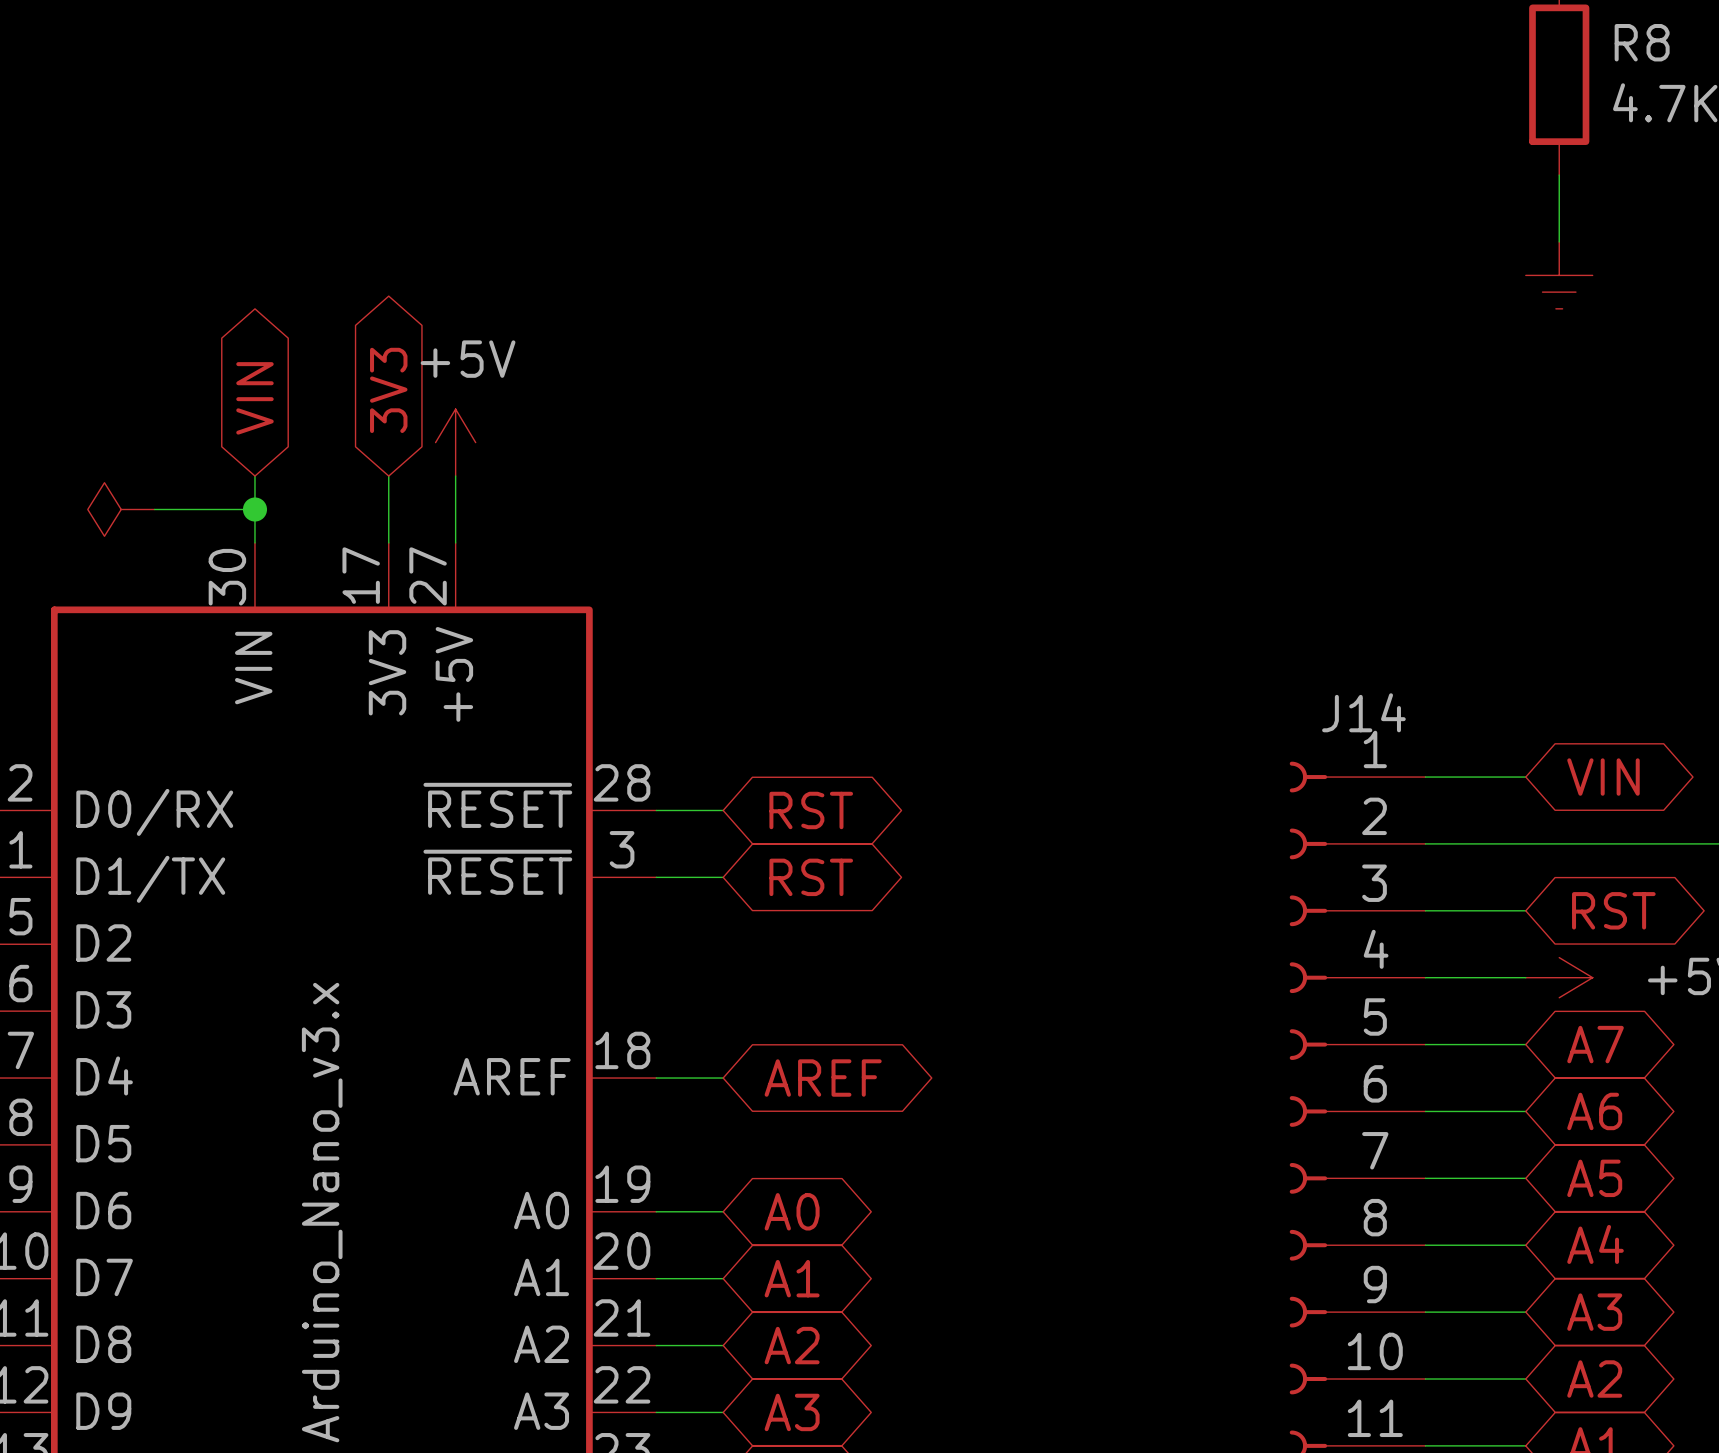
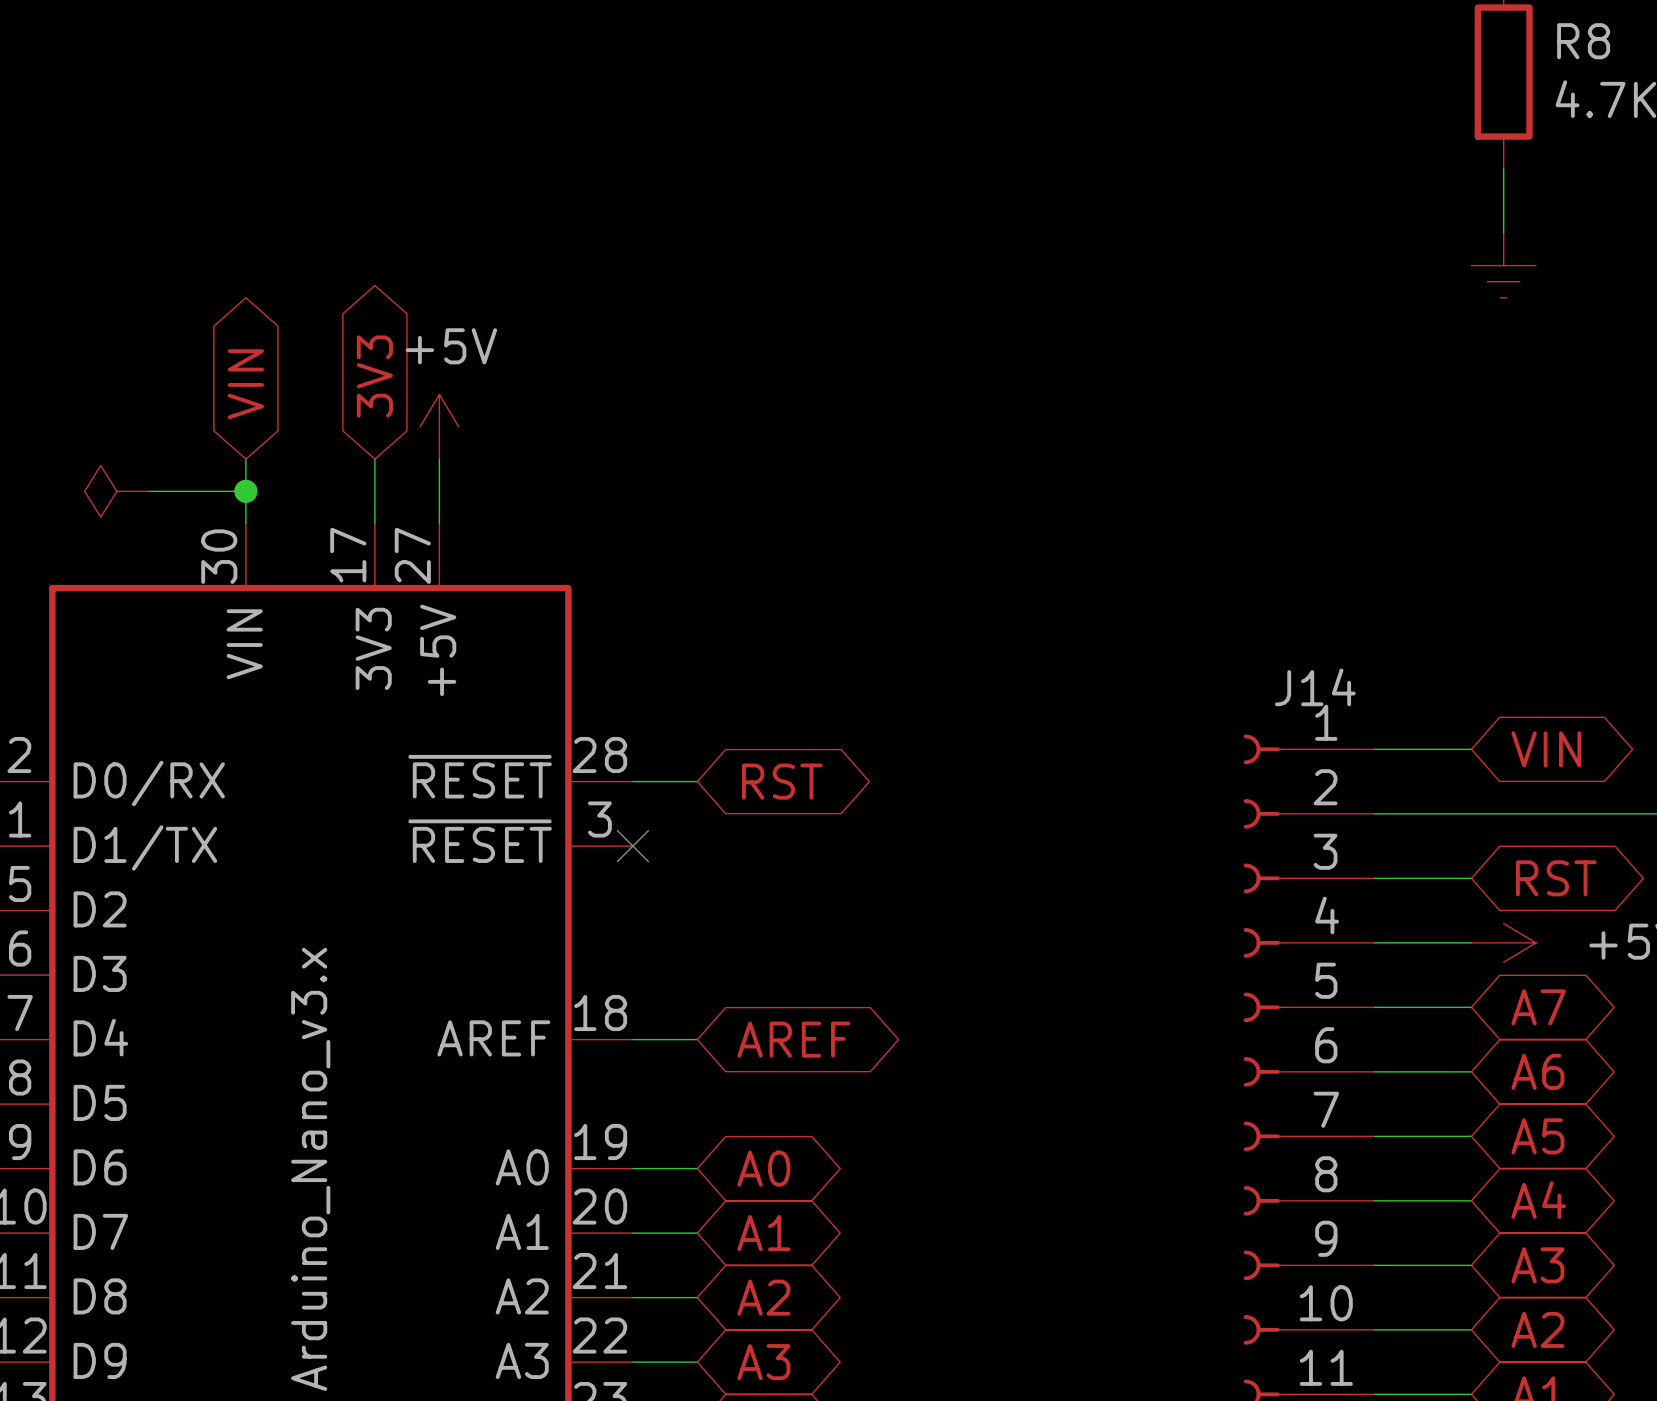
wire: (656, 877) (723, 877) -> none
no-connect mark: none -> (632, 846)
global label: RST (811, 877) -> none

